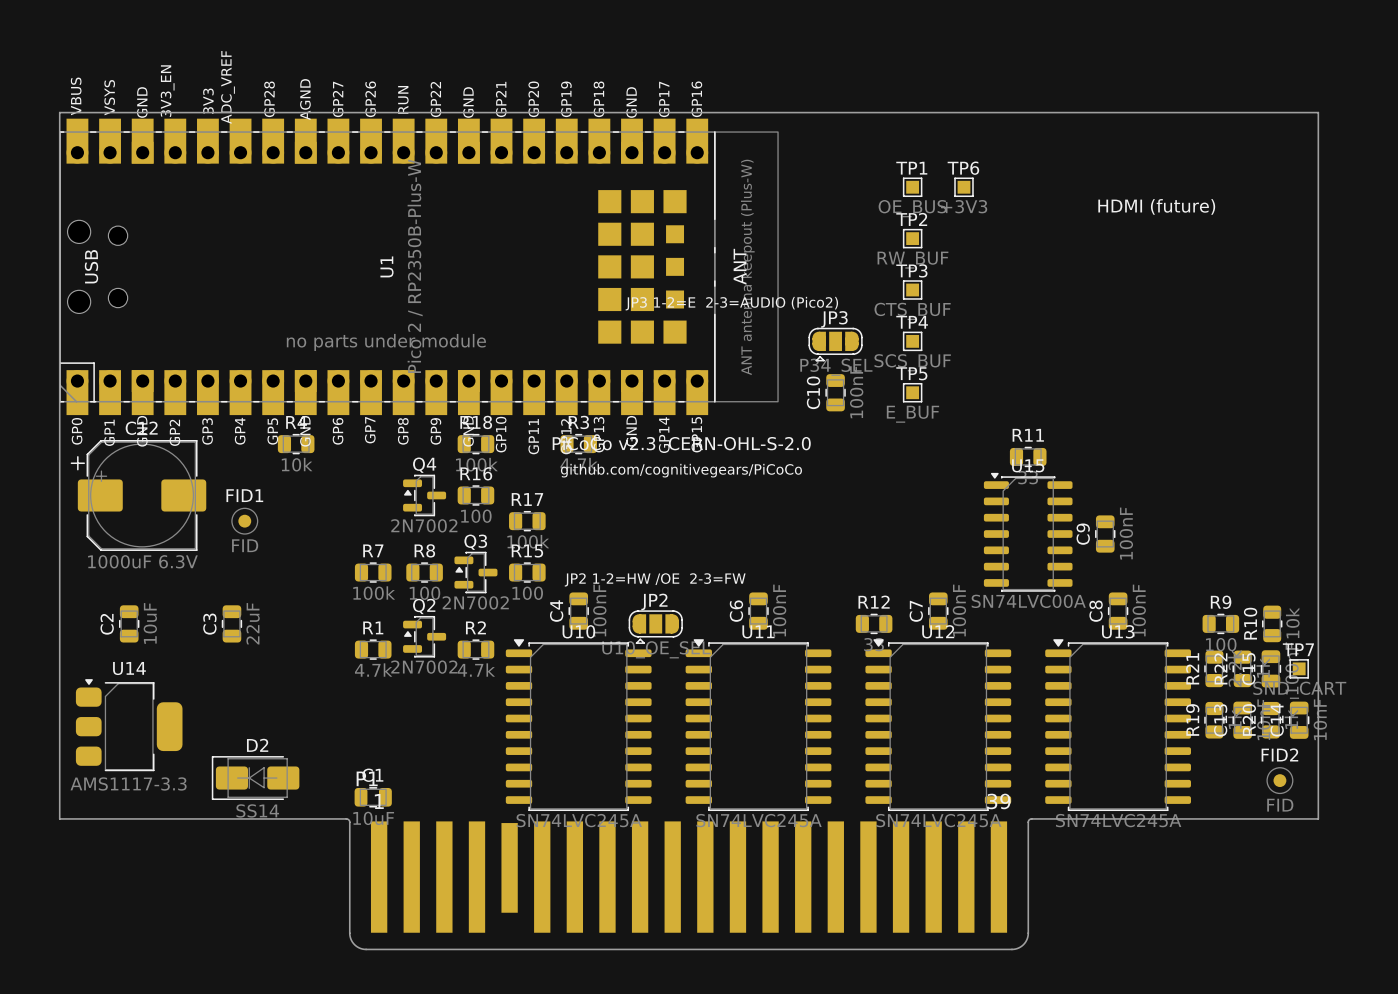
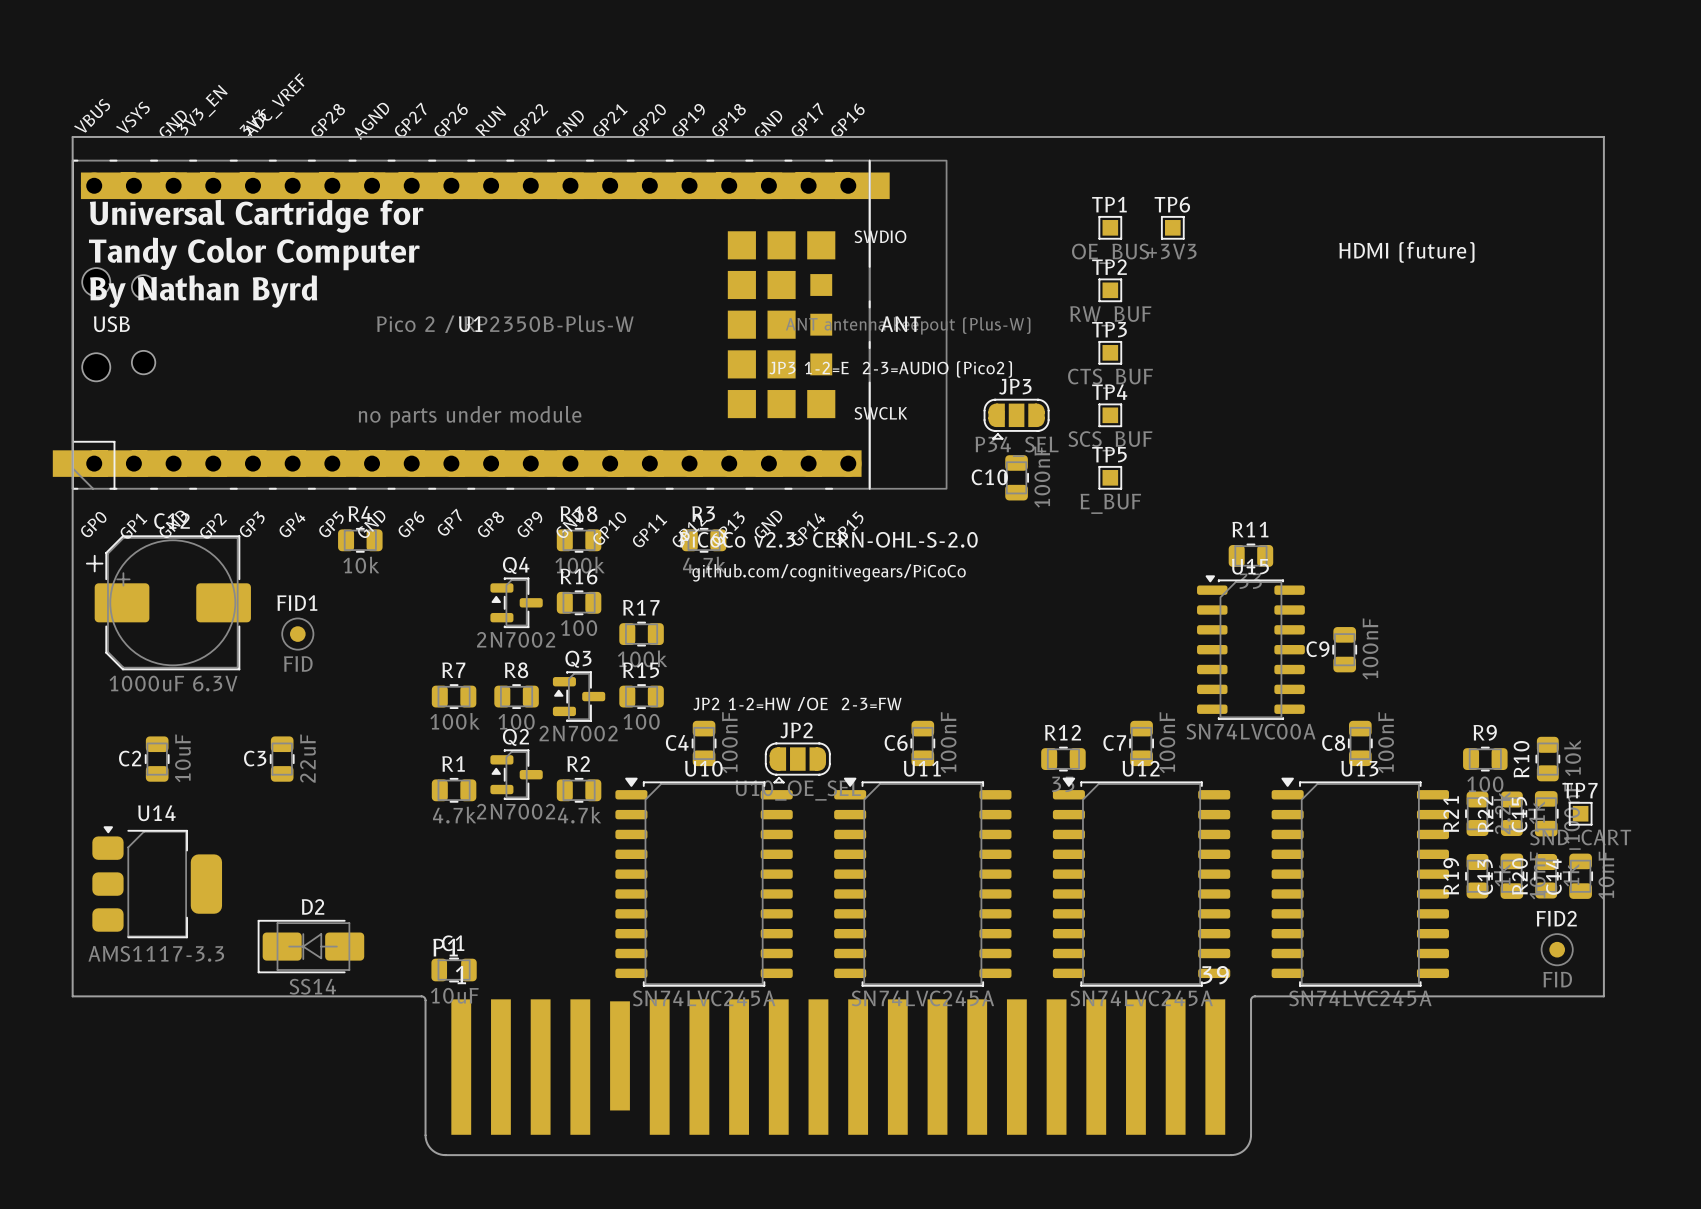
U1 footprint: [59, 118, 779, 416] -> [52, 159, 948, 490]
text: none -> Universal Cartridge for (256, 216)
text: none -> Tandy Color Computer (254, 253)
text: none -> By Nathan Byrd (203, 291)
C10 name rotation: 0° (813, 392) -> 90° clockwise (989, 477)
C9 name rotation: 0° (1083, 534) -> 90° clockwise (1317, 649)
C4 name rotation: 0° (556, 611) -> 90° clockwise (677, 742)
C6 name rotation: 0° (736, 611) -> 90° clockwise (896, 742)
C7 name rotation: 0° (916, 611) -> 90° clockwise (1114, 742)
C8 name rotation: 0° (1096, 611) -> 90° clockwise (1333, 742)
C2 name rotation: 0° (107, 624) -> 90° clockwise (130, 758)
C3 name rotation: 0° (209, 624) -> 90° clockwise (255, 758)

